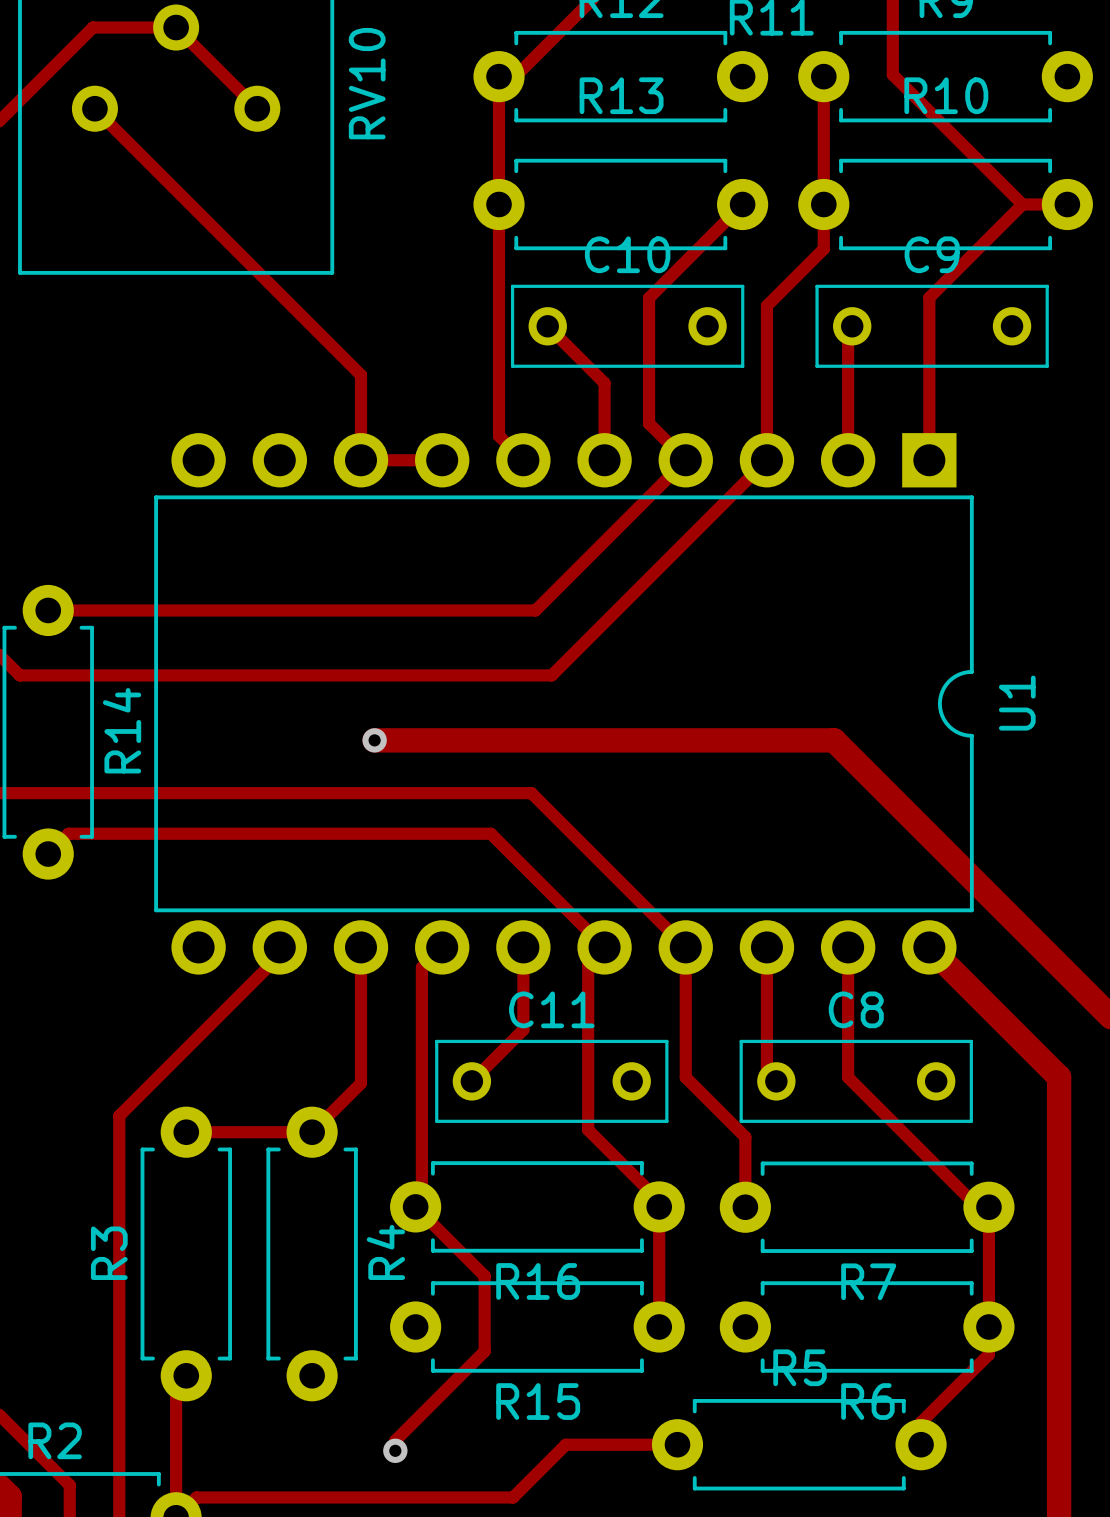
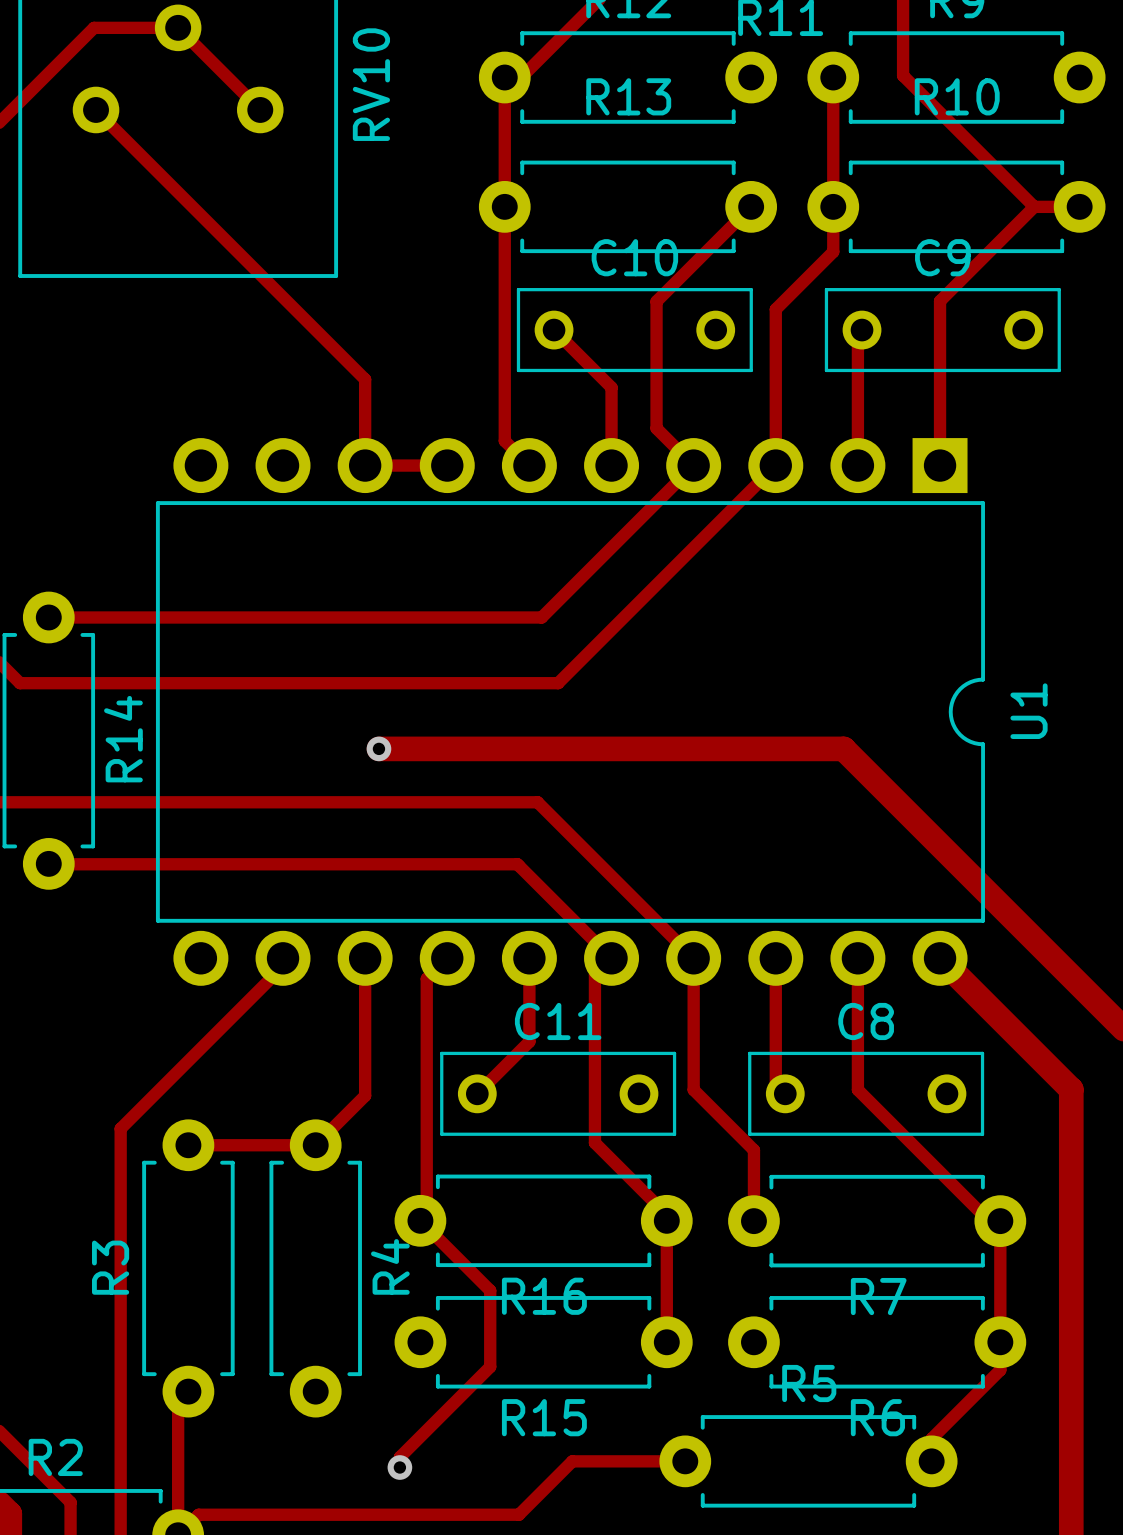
track: (48, 854) (68, 833) (490, 833) (511, 854) -> (48, 864) (517, 864)

